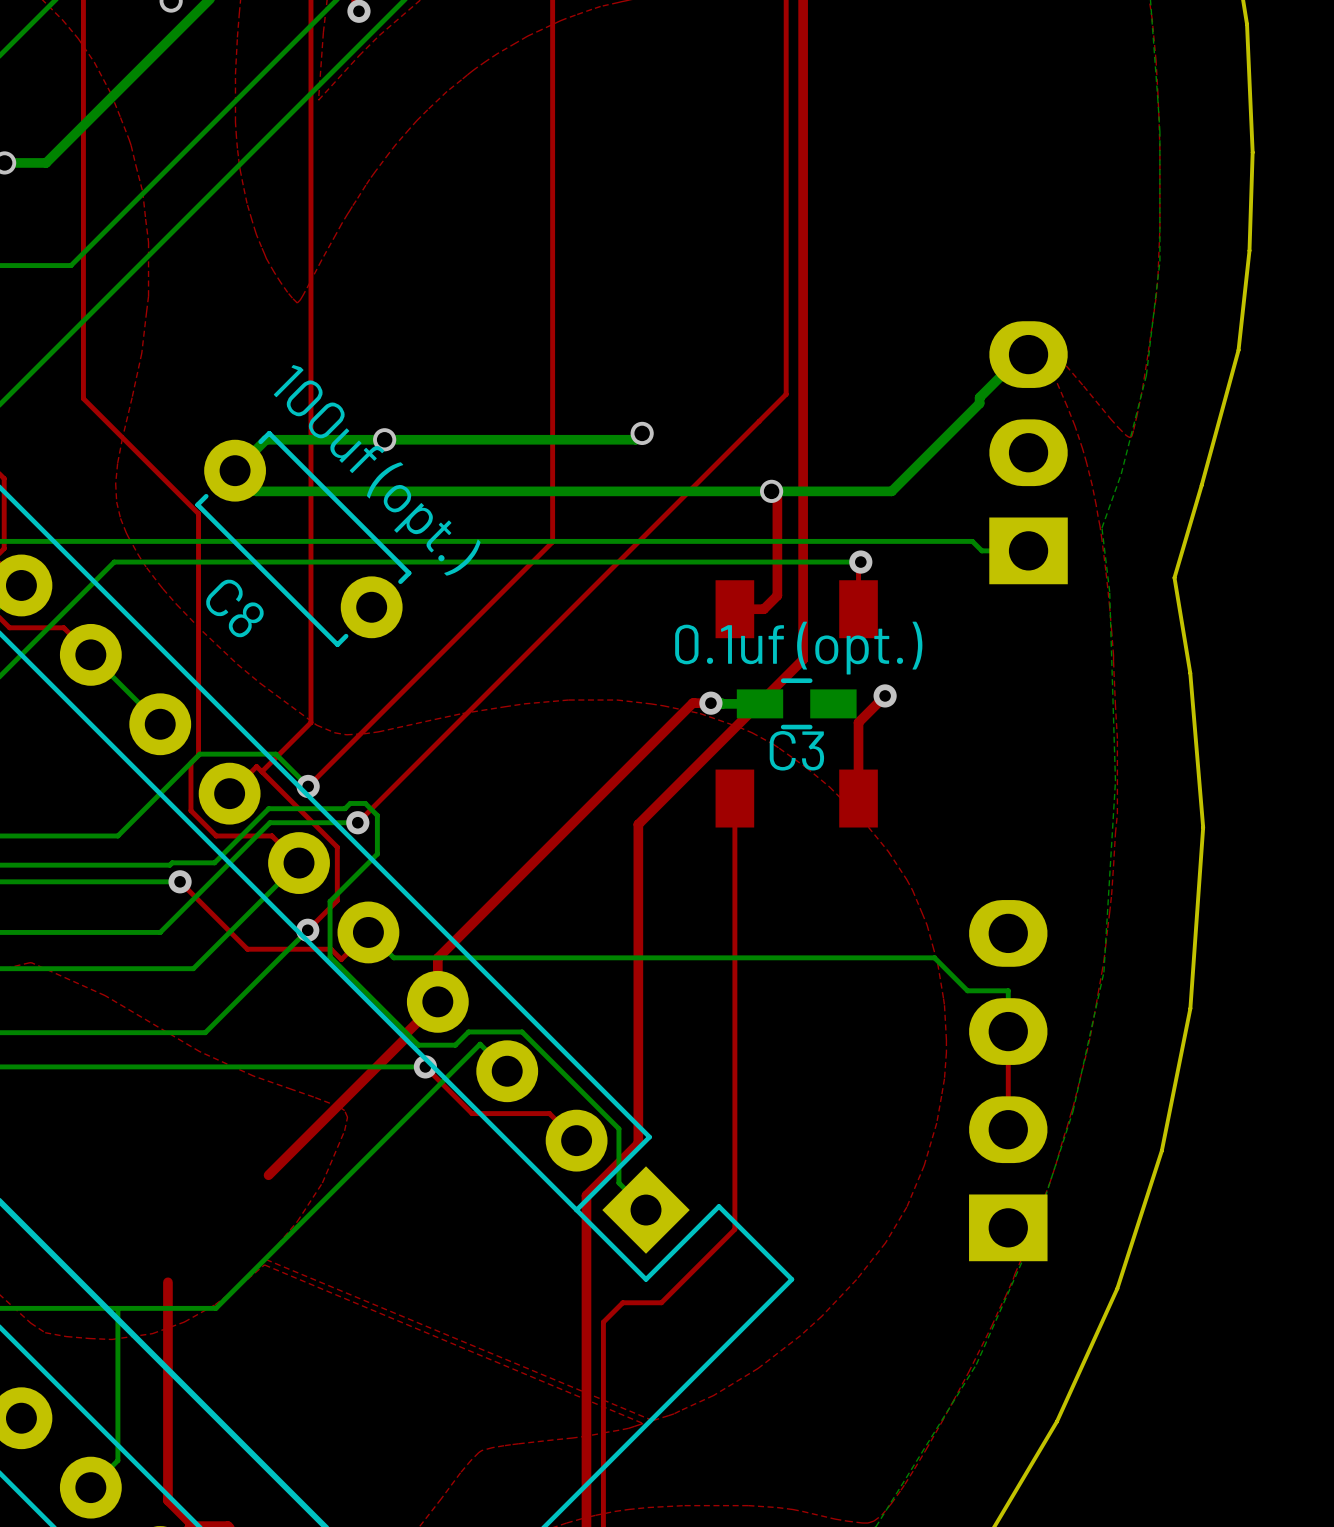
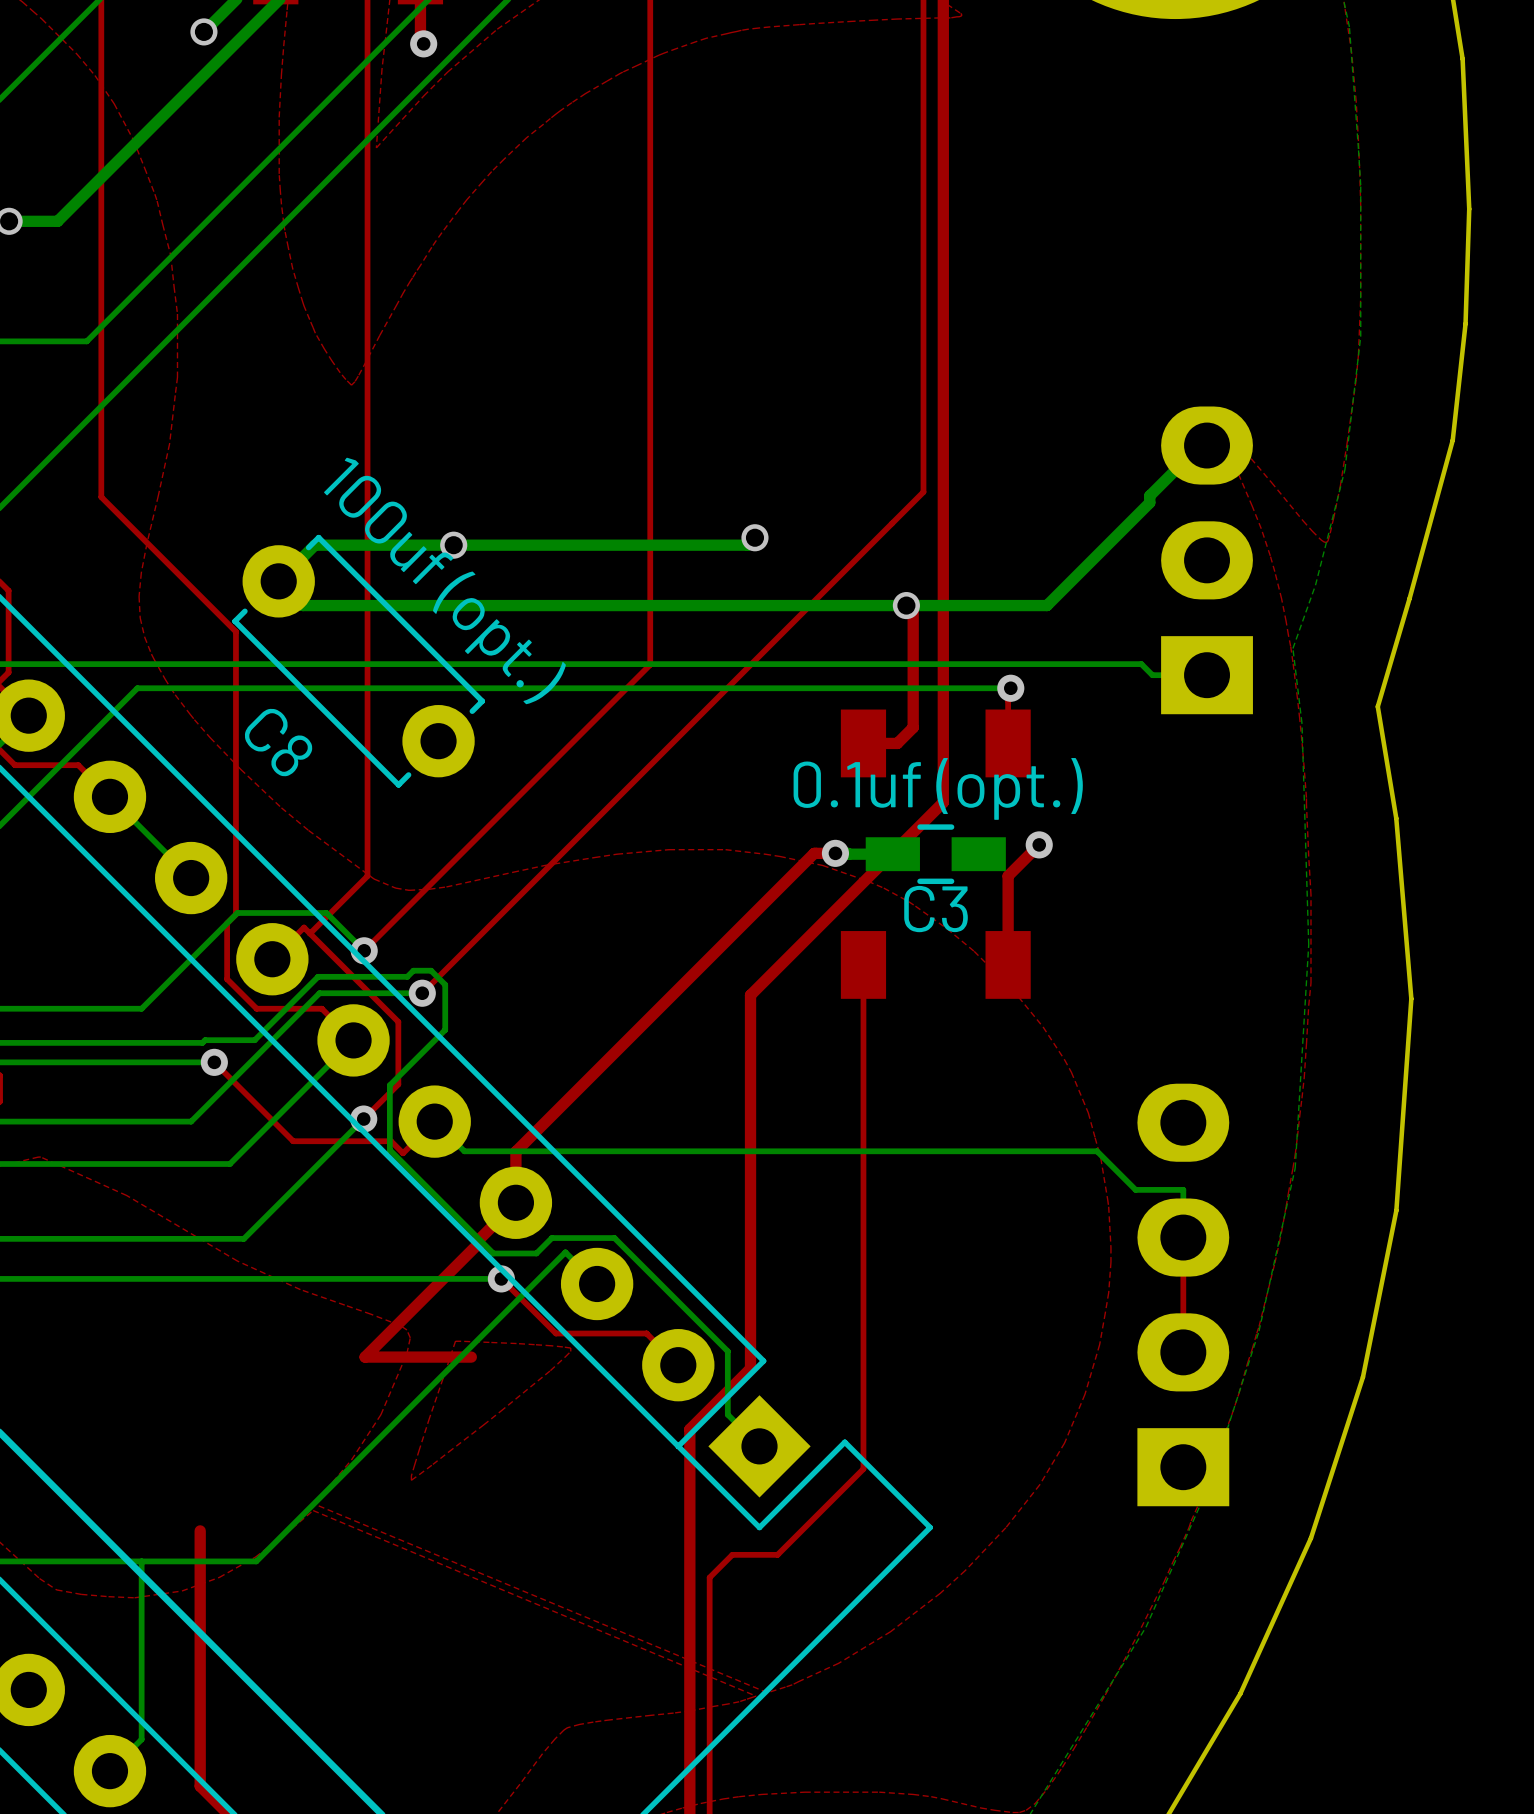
top track: (405, 1038) (268, 1175) -> (478, 1245) (479, 1243) (365, 1357) (471, 1357)
top zone outline: none -> (461, 1341) (551, 1345) (570, 1348) (570, 1351) (500, 1411) (411, 1480) (419, 1449) (455, 1341) (461, 1341)

